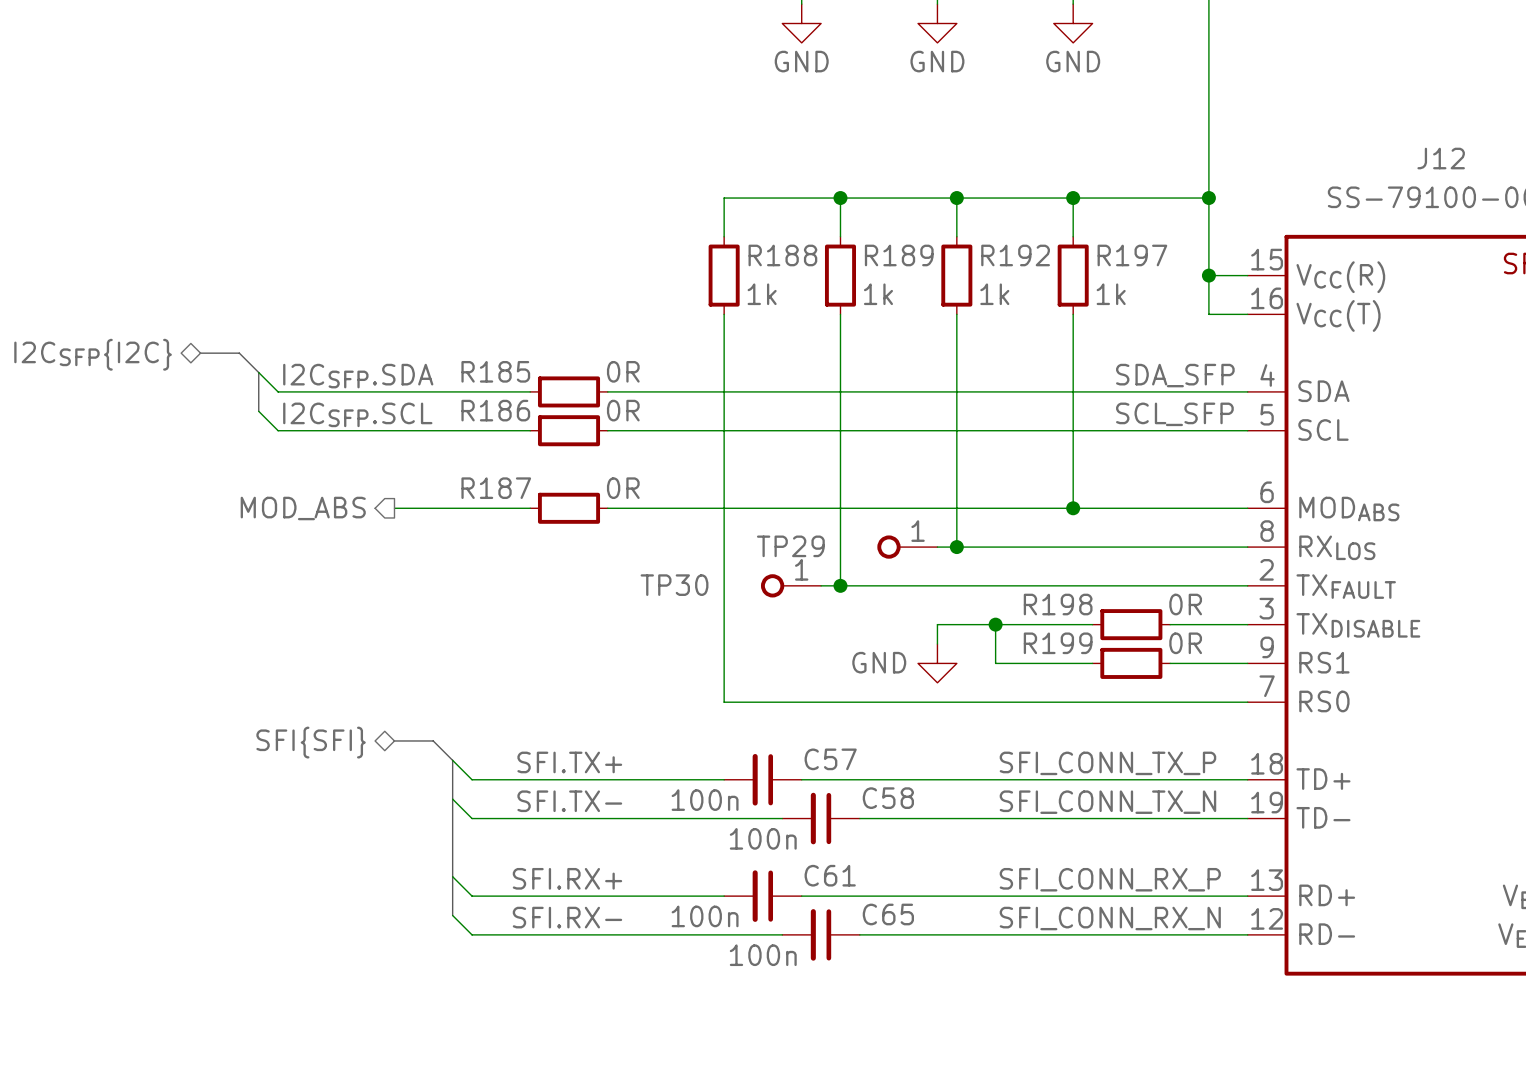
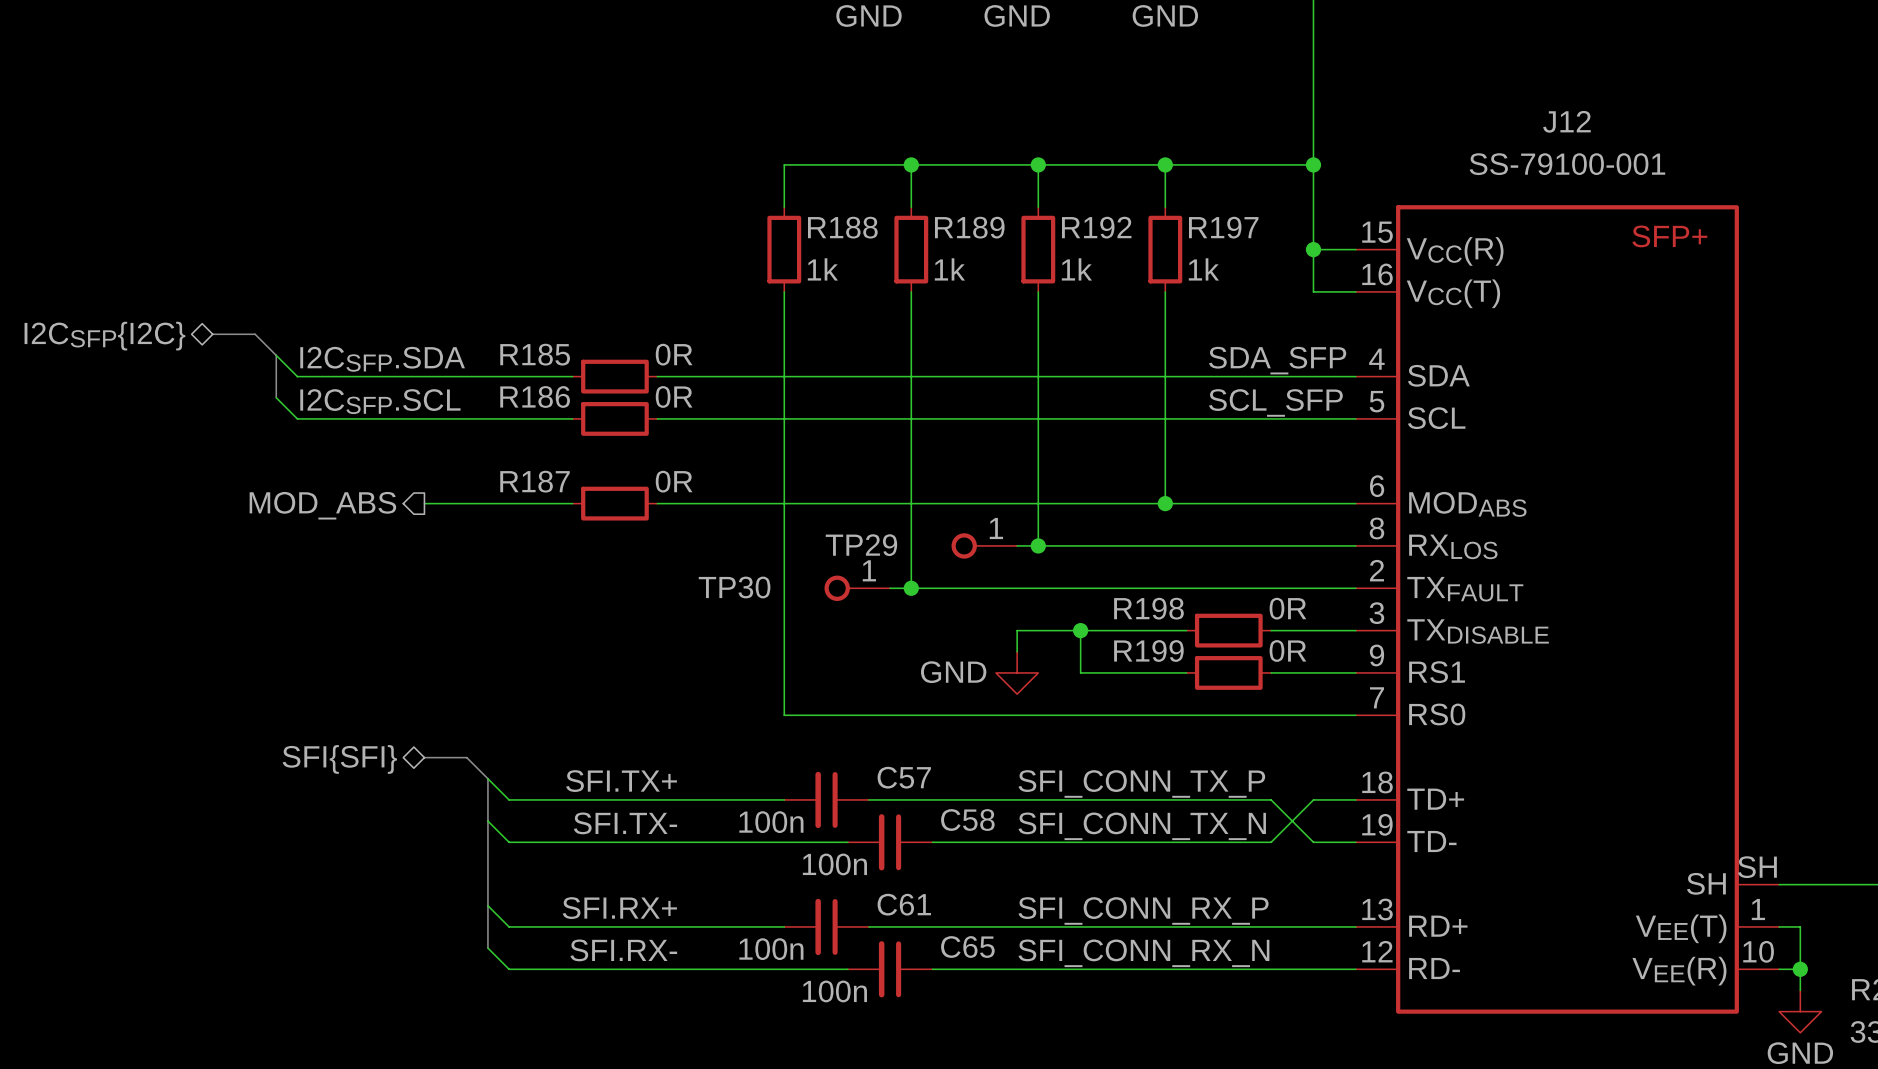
label position: SFI_CONN_TX_P (1107, 763) -> SFI_CONN_TX_P (1141, 783)
wire: (1170, 779) (1208, 779) -> (1271, 799) (1313, 842)
label position: SFI_CONN_TX_N (1107, 802) -> SFI_CONN_TX_N (1142, 826)
wire: (1170, 818) (1208, 818) -> (1271, 842) (1313, 799)
label position: SFI_CONN_RX_P (1110, 879) -> SFI_CONN_RX_P (1143, 910)
label position: SFI_CONN_RX_N (1110, 918) -> SFI_CONN_RX_N (1143, 953)

